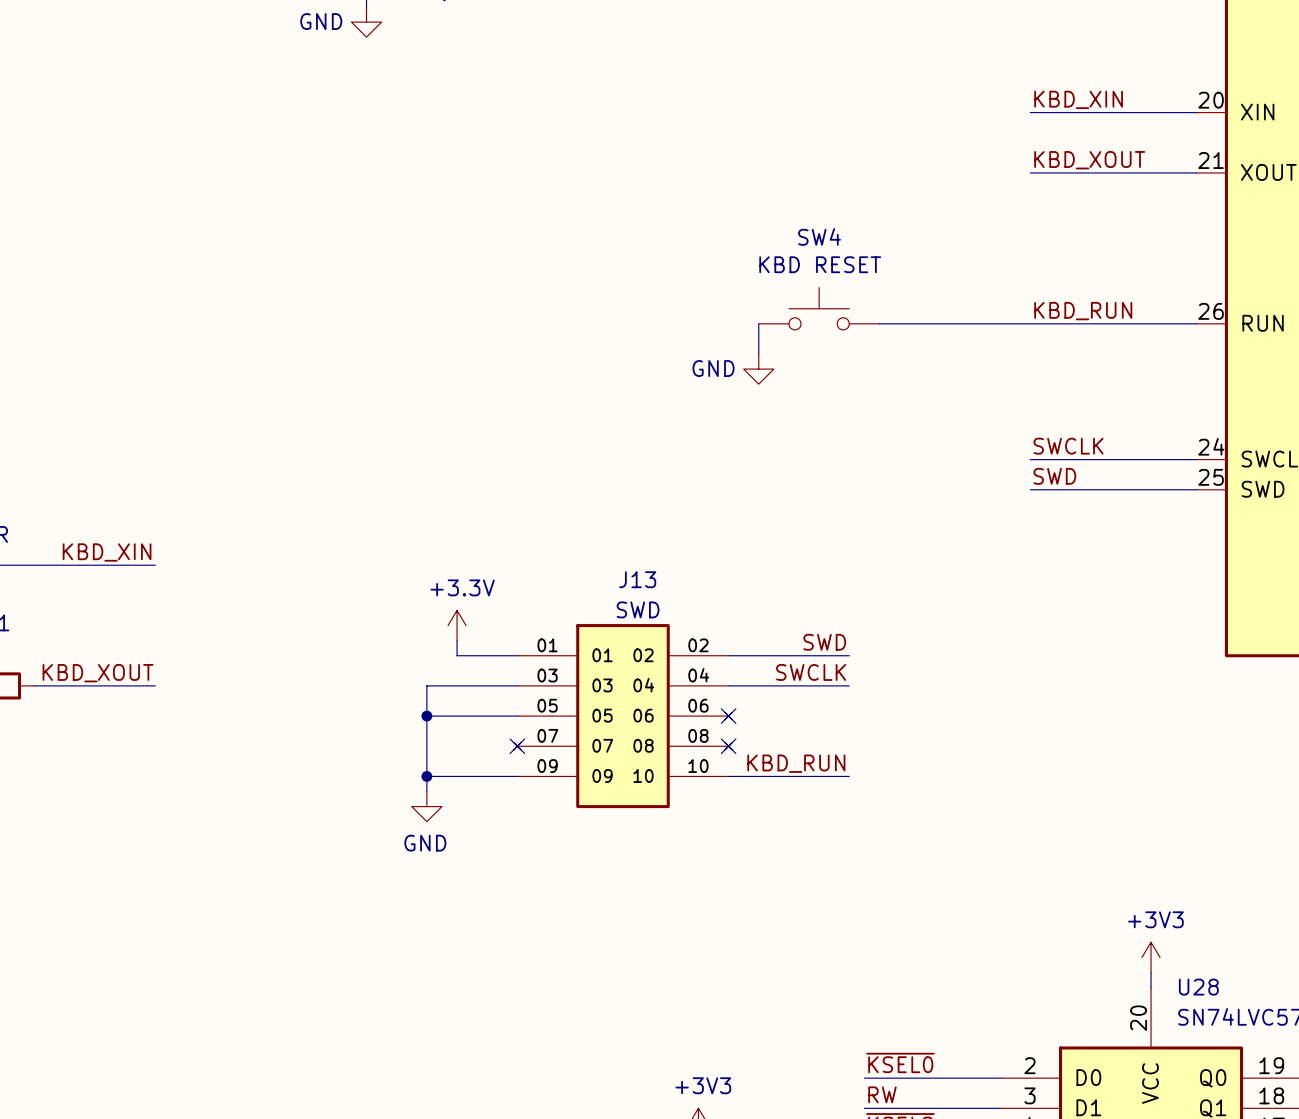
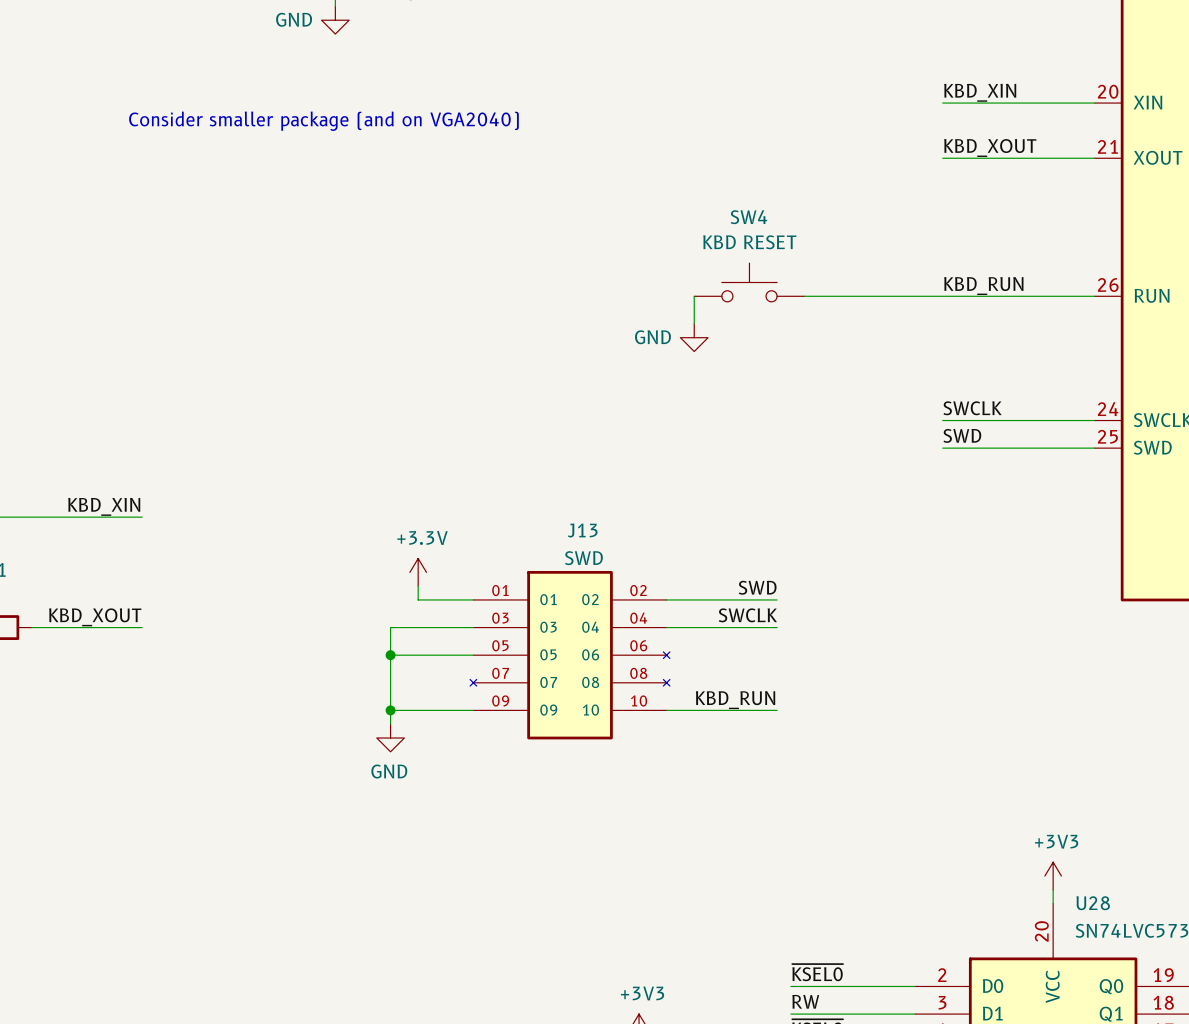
text: none -> Consider smaller package (and on VGA2040) (323, 121)
no-connect mark: (728, 716) -> none
no-connect mark: (517, 746) -> none
no-connect mark: (728, 746) -> none

